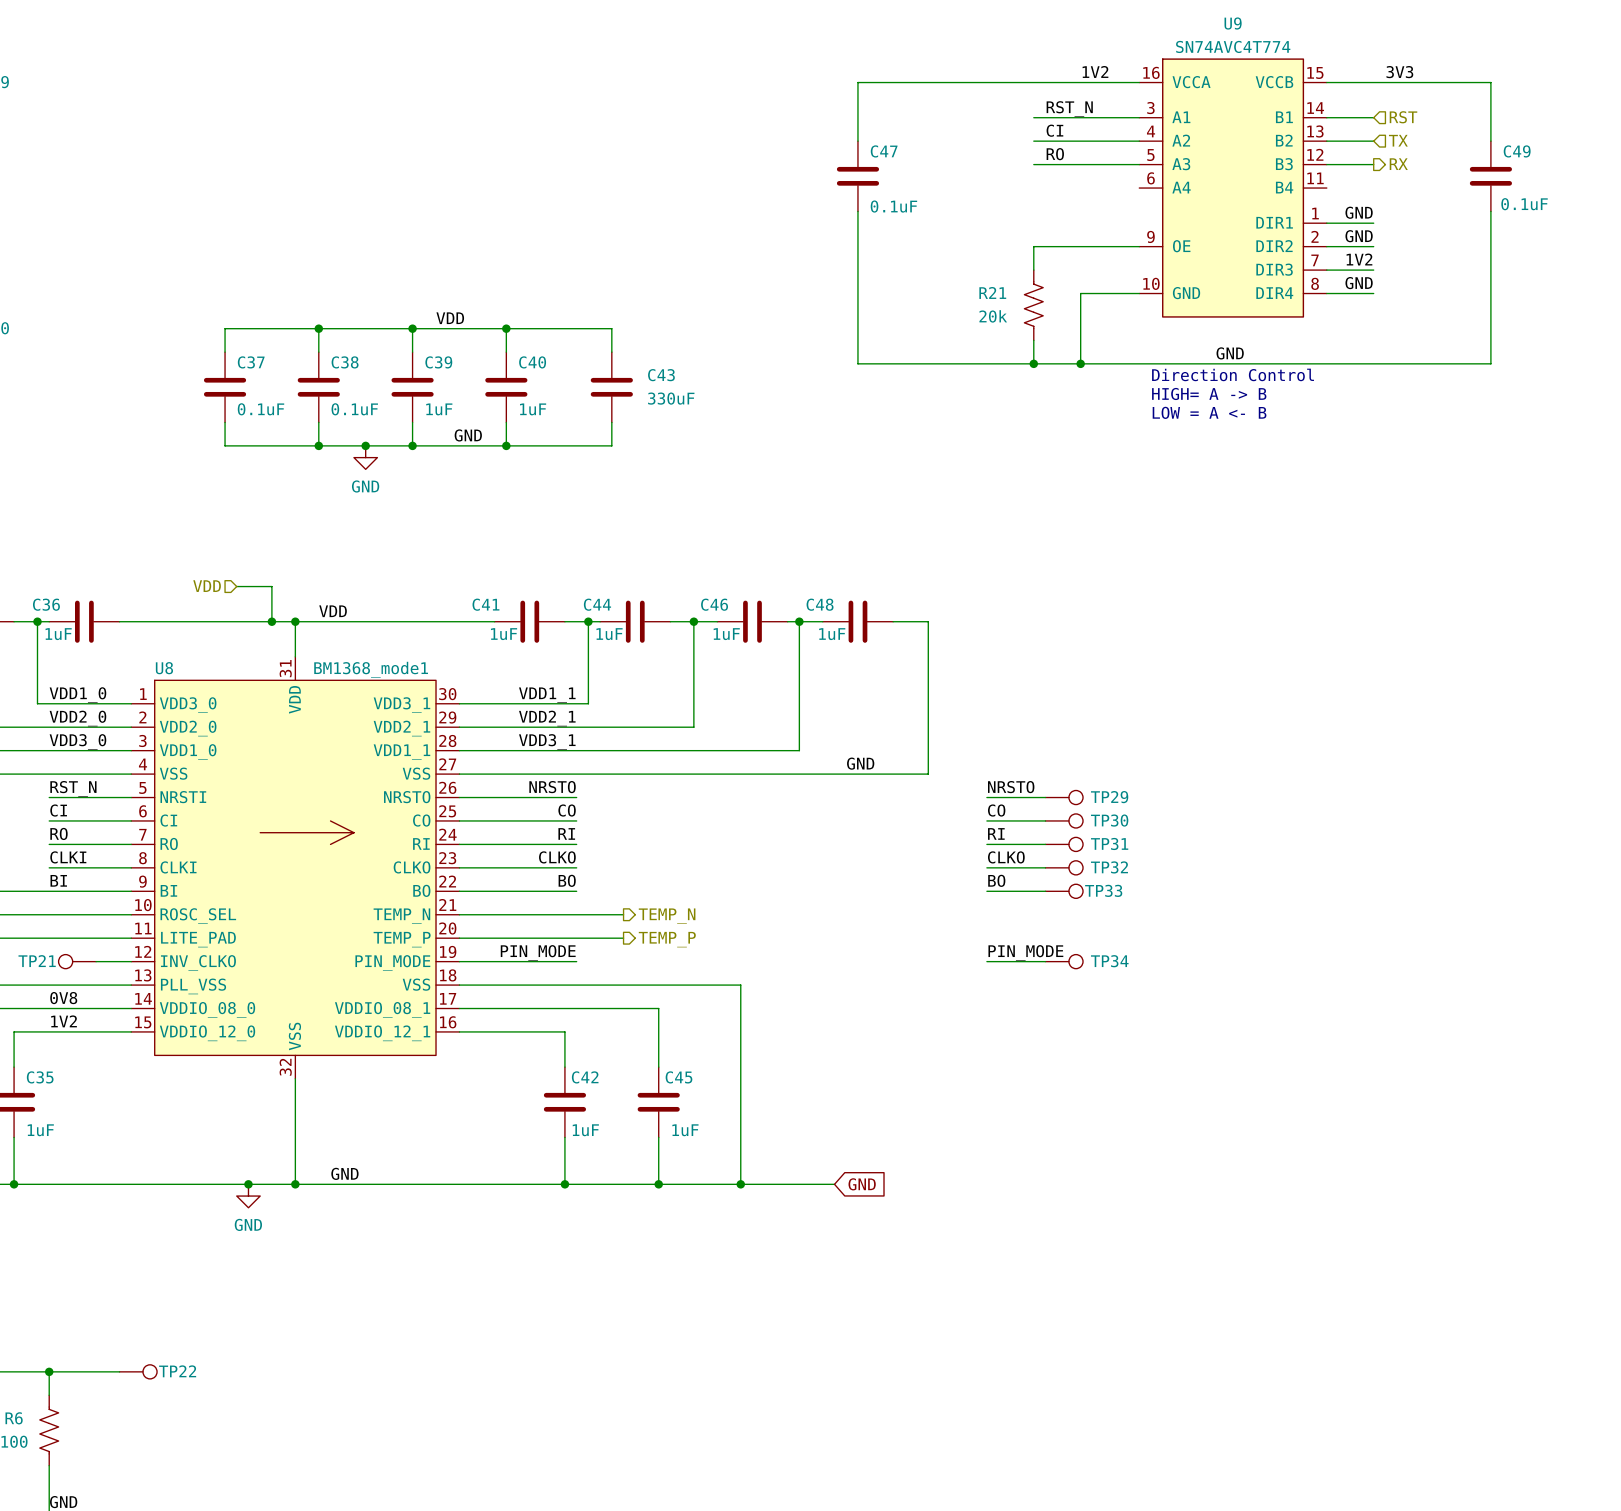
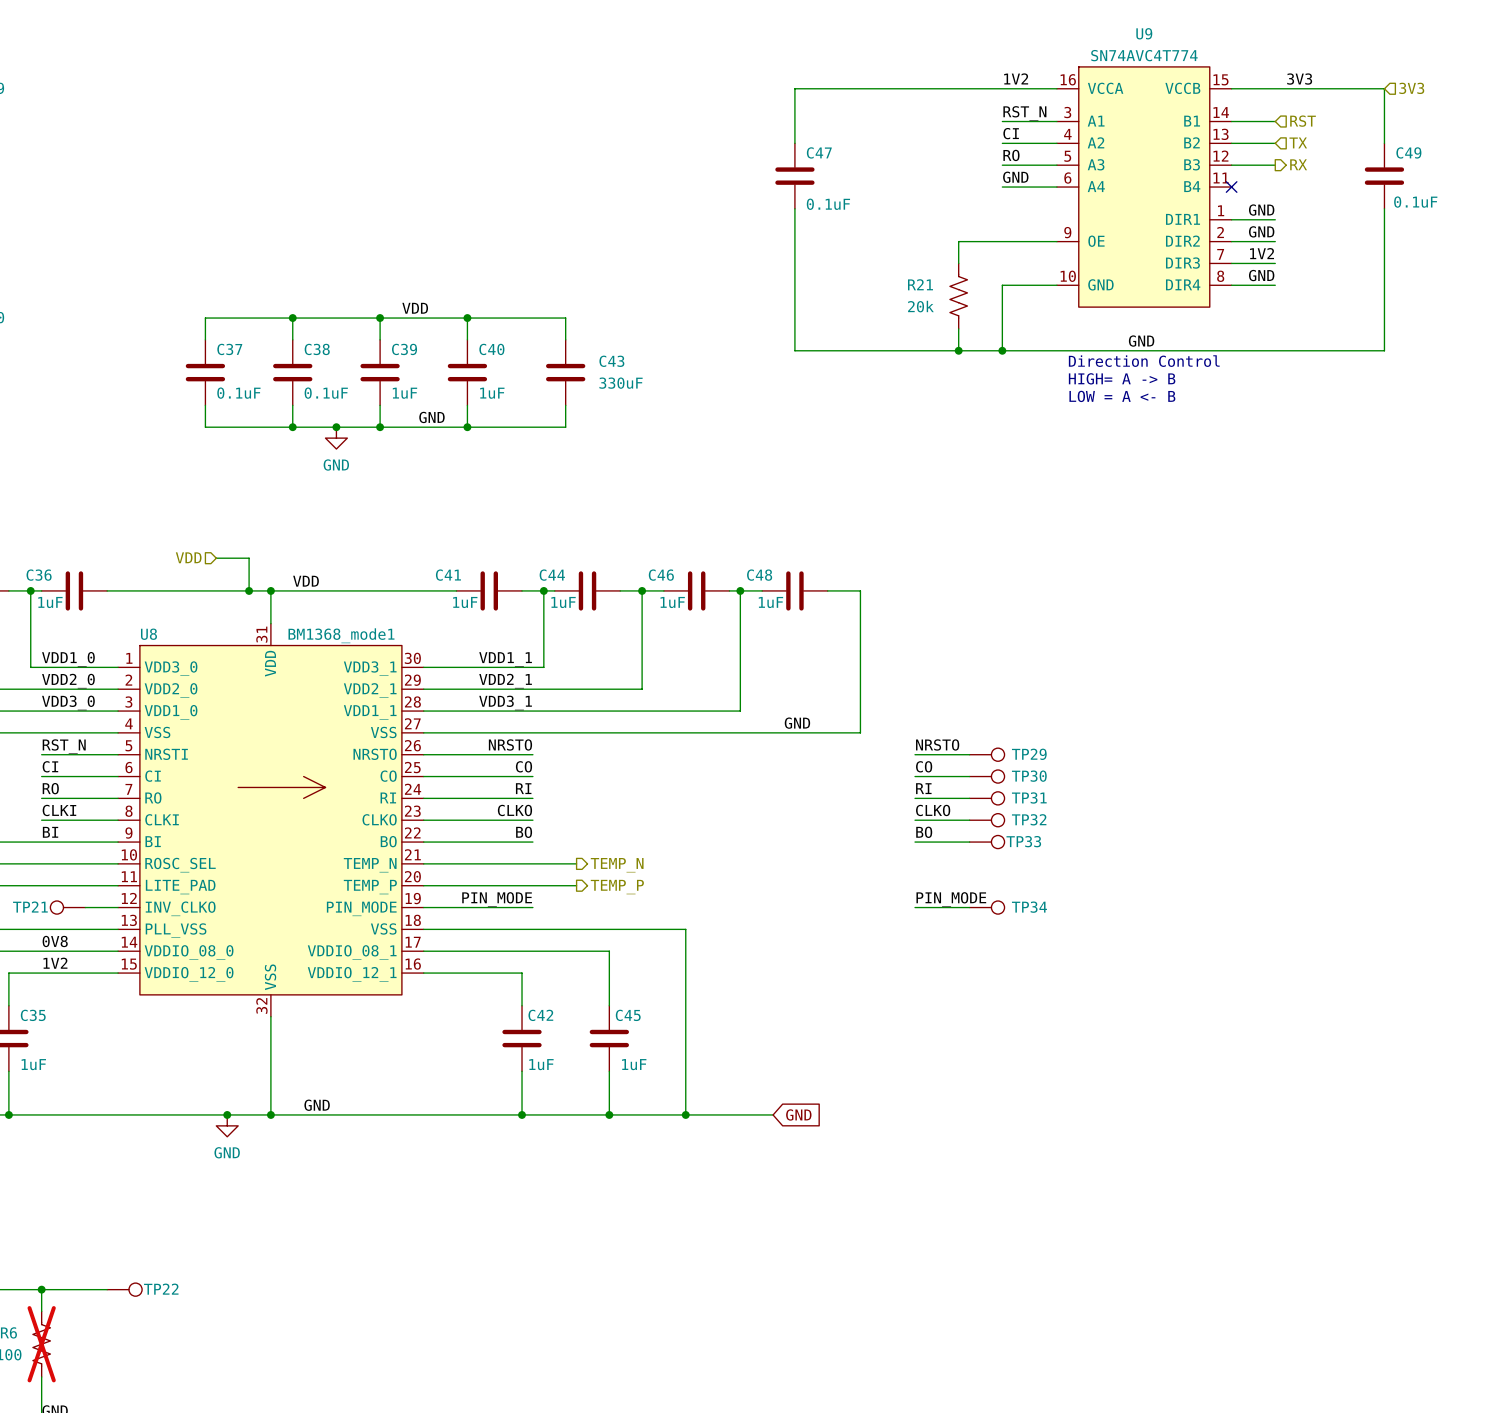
hierarchical label: none -> 3V3 (1411, 88)
label position: RST_N (1069, 109) -> RST_N (1024, 113)
wire: (1033, 117) (1080, 117) -> none
label position: CI (1054, 130) -> CI (1011, 133)
wire: (1033, 141) (1080, 141) -> none
label position: RO (1055, 154) -> RO (1011, 155)
wire: (1033, 164) (1080, 164) -> none
label: none -> GND (1015, 177)
wire: none -> (1002, 187) (1056, 187)
no-connect mark: none -> (1231, 187)
R6 do-not-place cross: none -> (41, 1344)

